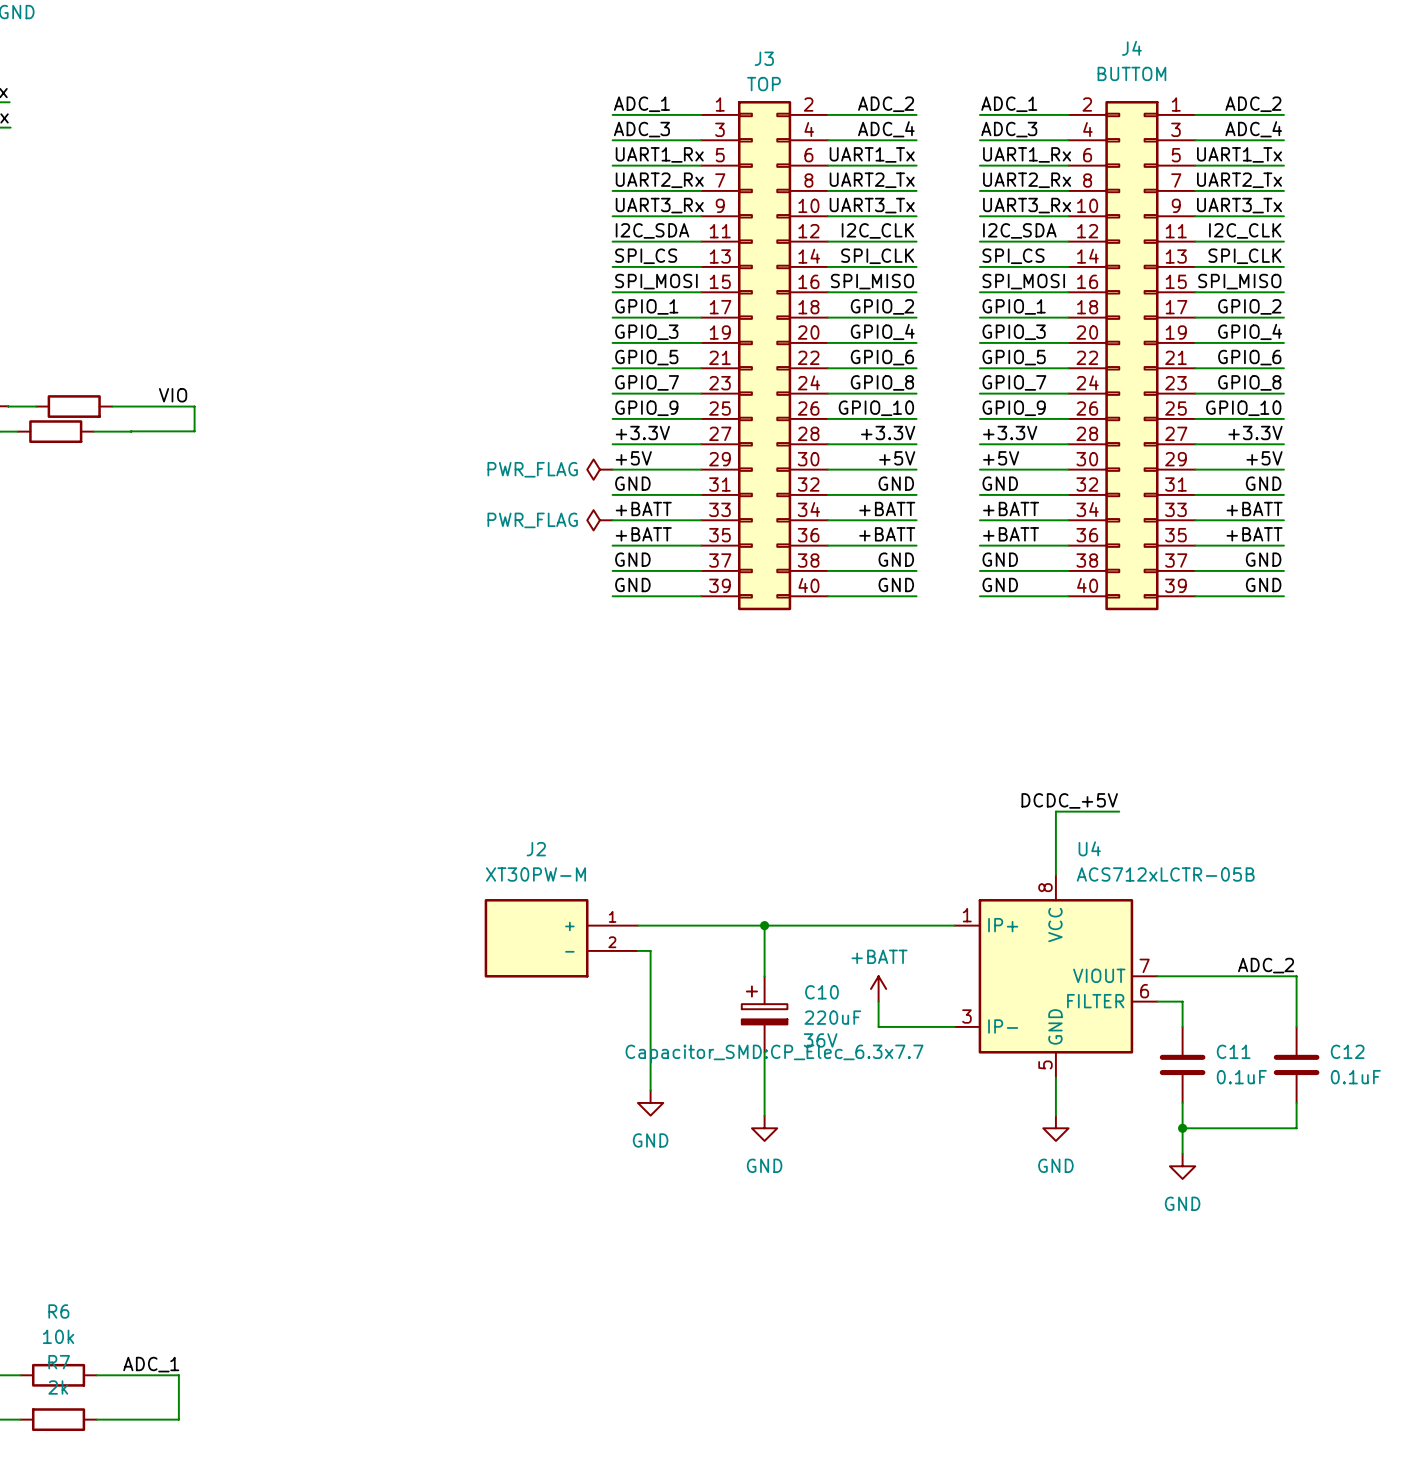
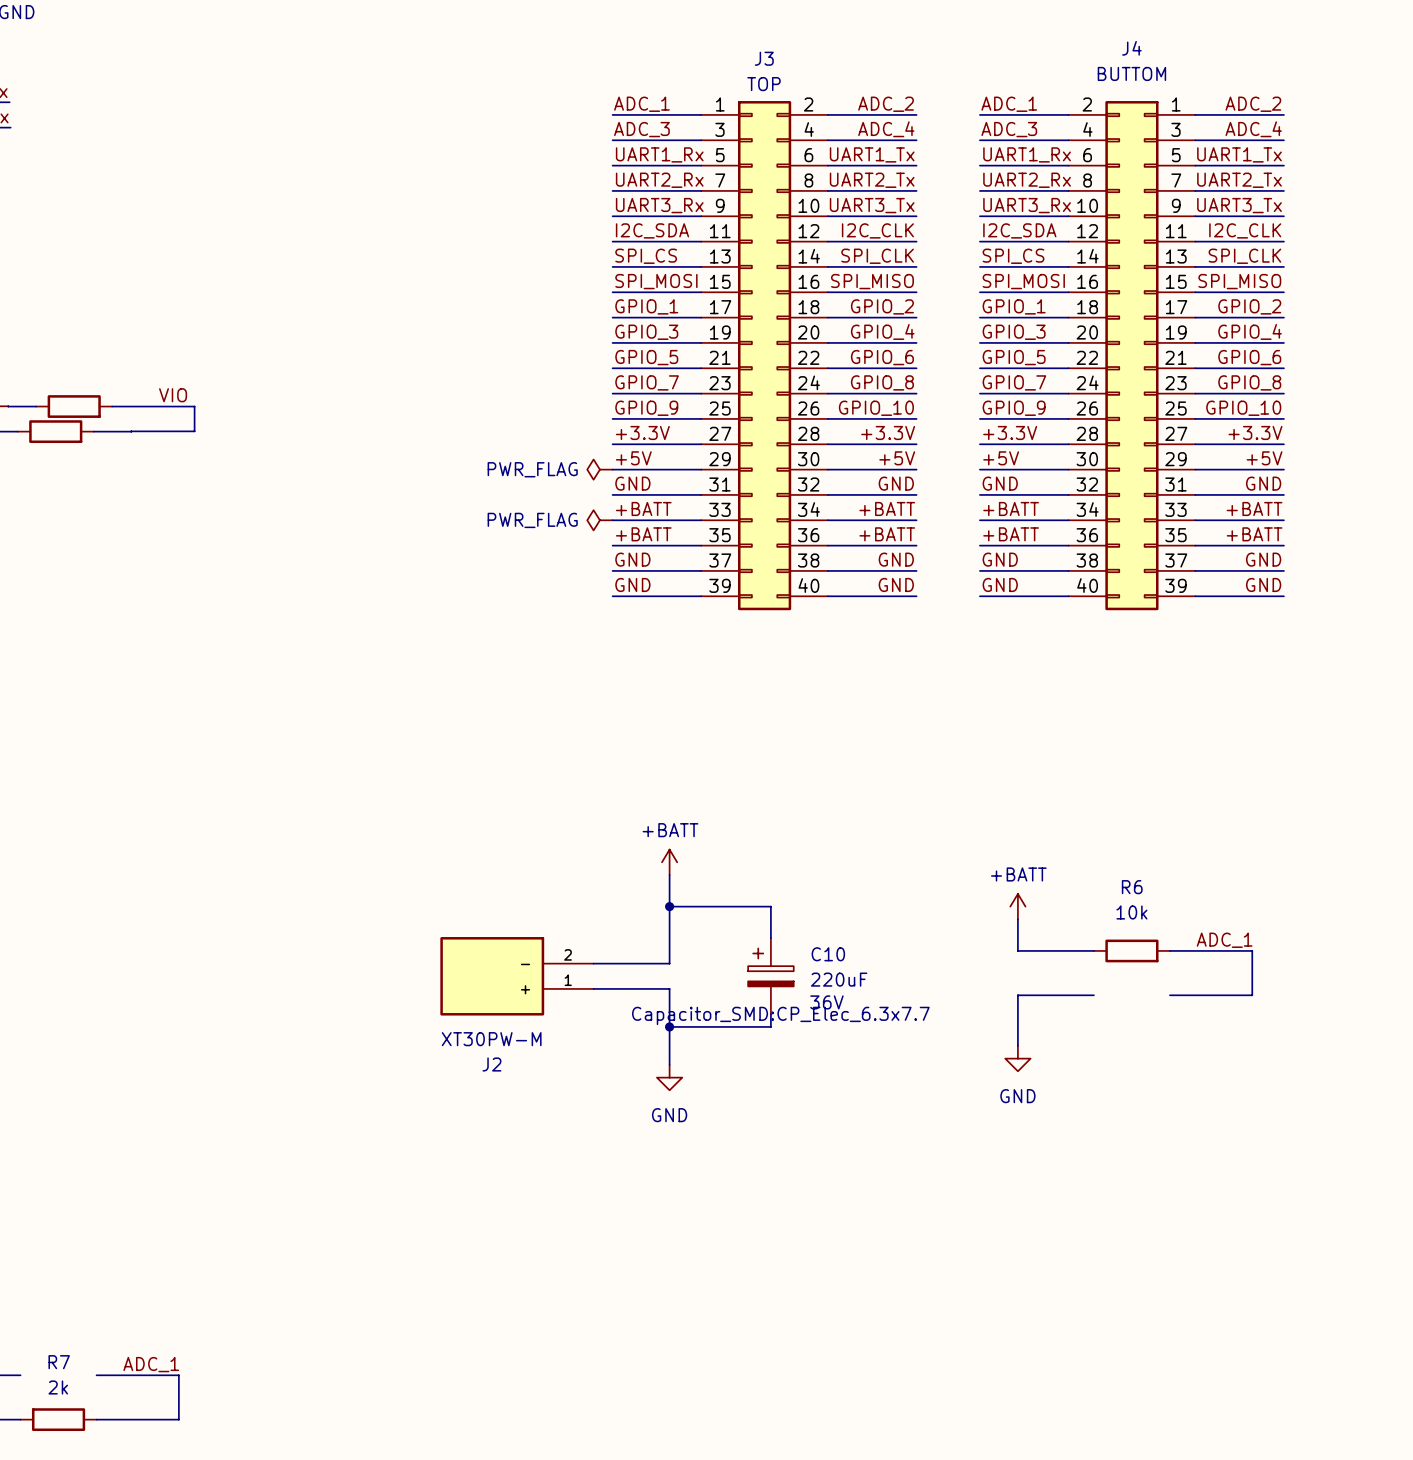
label: DCDC_+5V (1069, 800) -> none
wire: (1119, 811) (1055, 811) (1055, 874) -> none
power symbol: none -> +BATT (669, 862)
wire: none -> (669, 874) (669, 963) (593, 963)
wire: none -> (669, 906) (770, 906) (770, 938)
junction: none -> (669, 906)
power symbol: none -> +BATT (1017, 906)
wire: (637, 925) (954, 925) -> none
wire: (764, 925) (764, 976) -> none
junction: (764, 925) -> none
J2 flip: as is (536, 938) -> up-down (492, 976)
wire: (637, 950) (650, 950) (650, 1090) -> none
wire: none -> (1169, 950) (1252, 950) (1252, 995) (1169, 995)
label: ADC_2 (1266, 965) -> ADC_1 (1224, 940)
U4: ACS712xLCTR-05B (1055, 976) -> none
wire: (1157, 976) (1296, 976) (1296, 1026) -> none
wire: none -> (593, 988) (669, 988) (669, 1064)
power symbol: +BATT (878, 988) -> none
wire: (878, 1001) (878, 1026) (954, 1026) -> none
wire: (1157, 1001) (1182, 1001) (1182, 1026) -> none
C10 position: (764, 1014) -> (770, 976)
wire: none -> (770, 1014) (770, 1026) (669, 1026)
junction: none -> (669, 1026)
wire: (764, 1052) (764, 1115) -> none
C11: 0.1uF (1182, 1064) -> none
C12: 0.1uF (1296, 1064) -> none
wire: (1055, 1077) (1055, 1115) -> none
power symbol position: GND (650, 1102) -> GND (669, 1077)
wire: (1182, 1102) (1182, 1153) -> none
wire: (1296, 1102) (1296, 1128) (1182, 1128) -> none
power symbol: GND (764, 1128) -> none
power symbol position: GND (1055, 1128) -> GND (1017, 1058)
junction: (1182, 1128) -> none
power symbol: GND (1182, 1166) -> none
R6 position: (58, 1375) -> (1131, 950)

